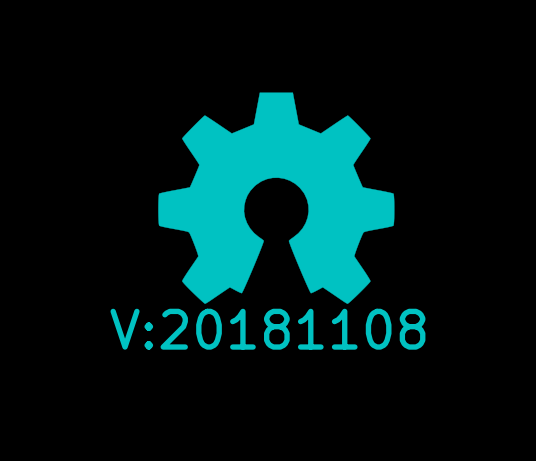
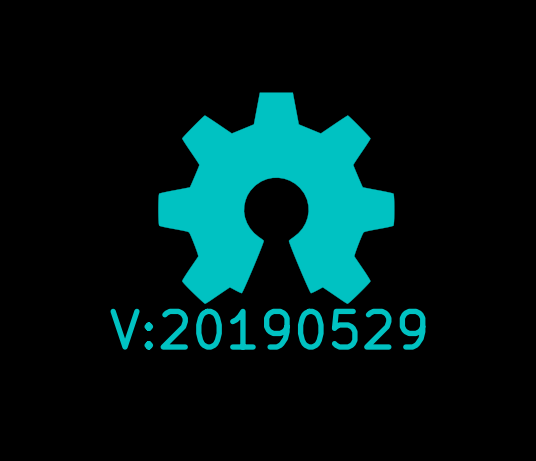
drawing shape: [110, 308, 426, 350] -> [110, 308, 426, 350]

